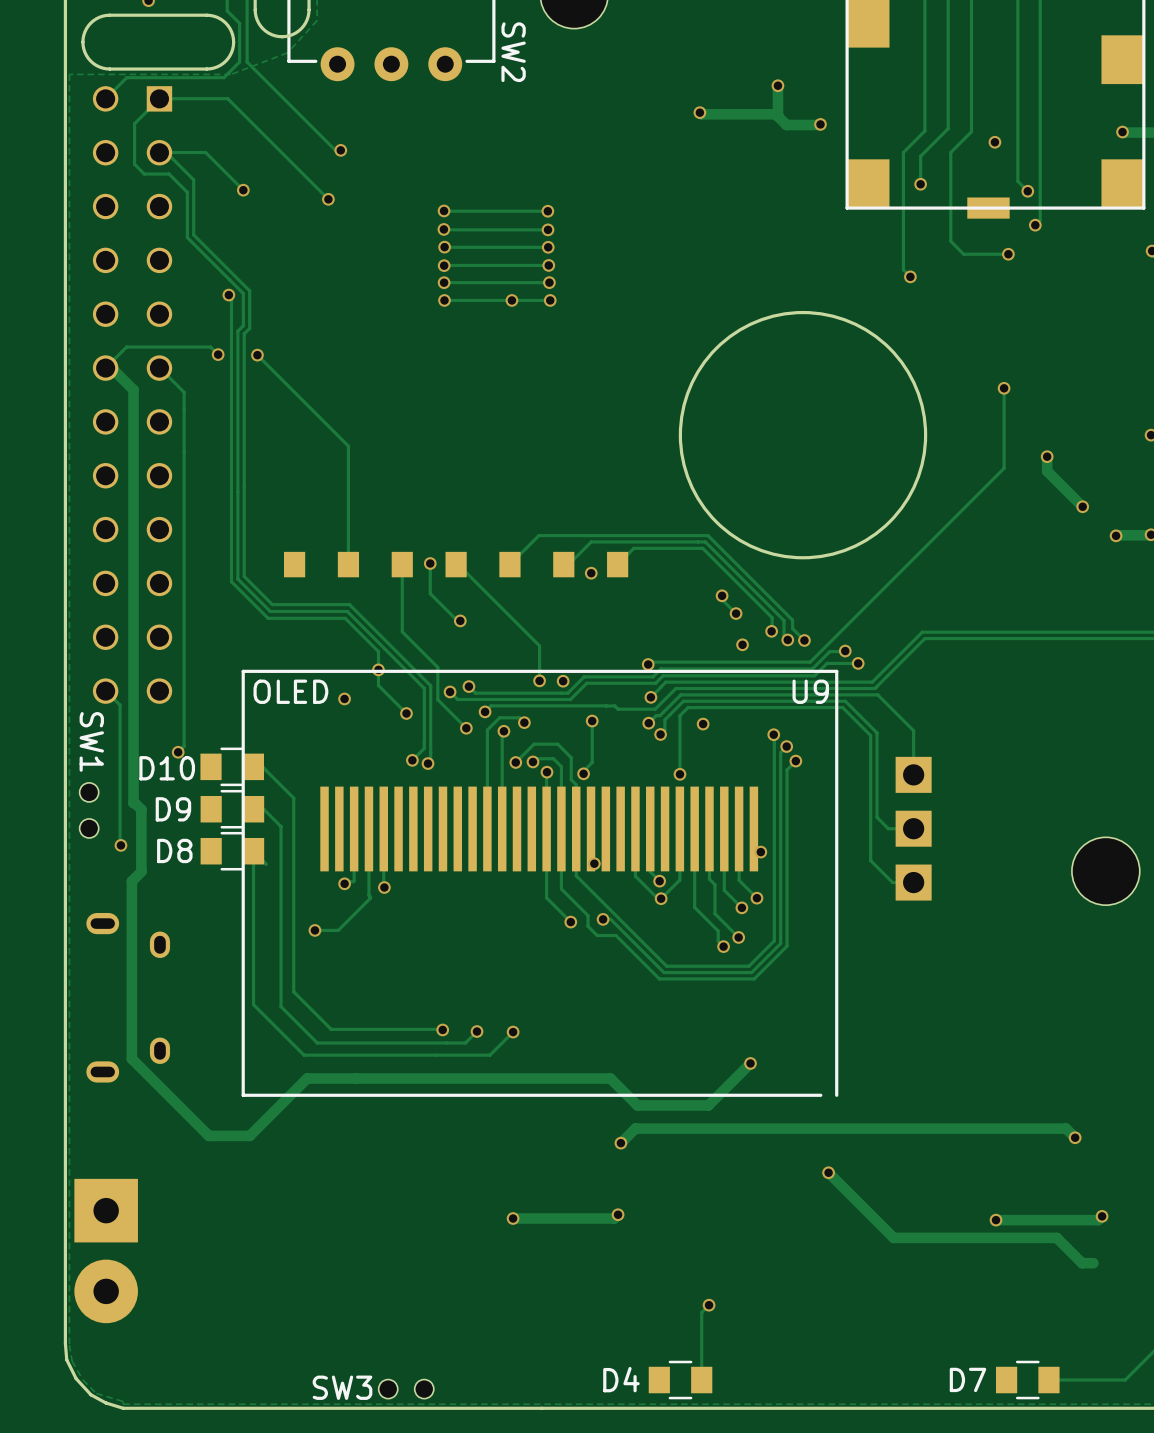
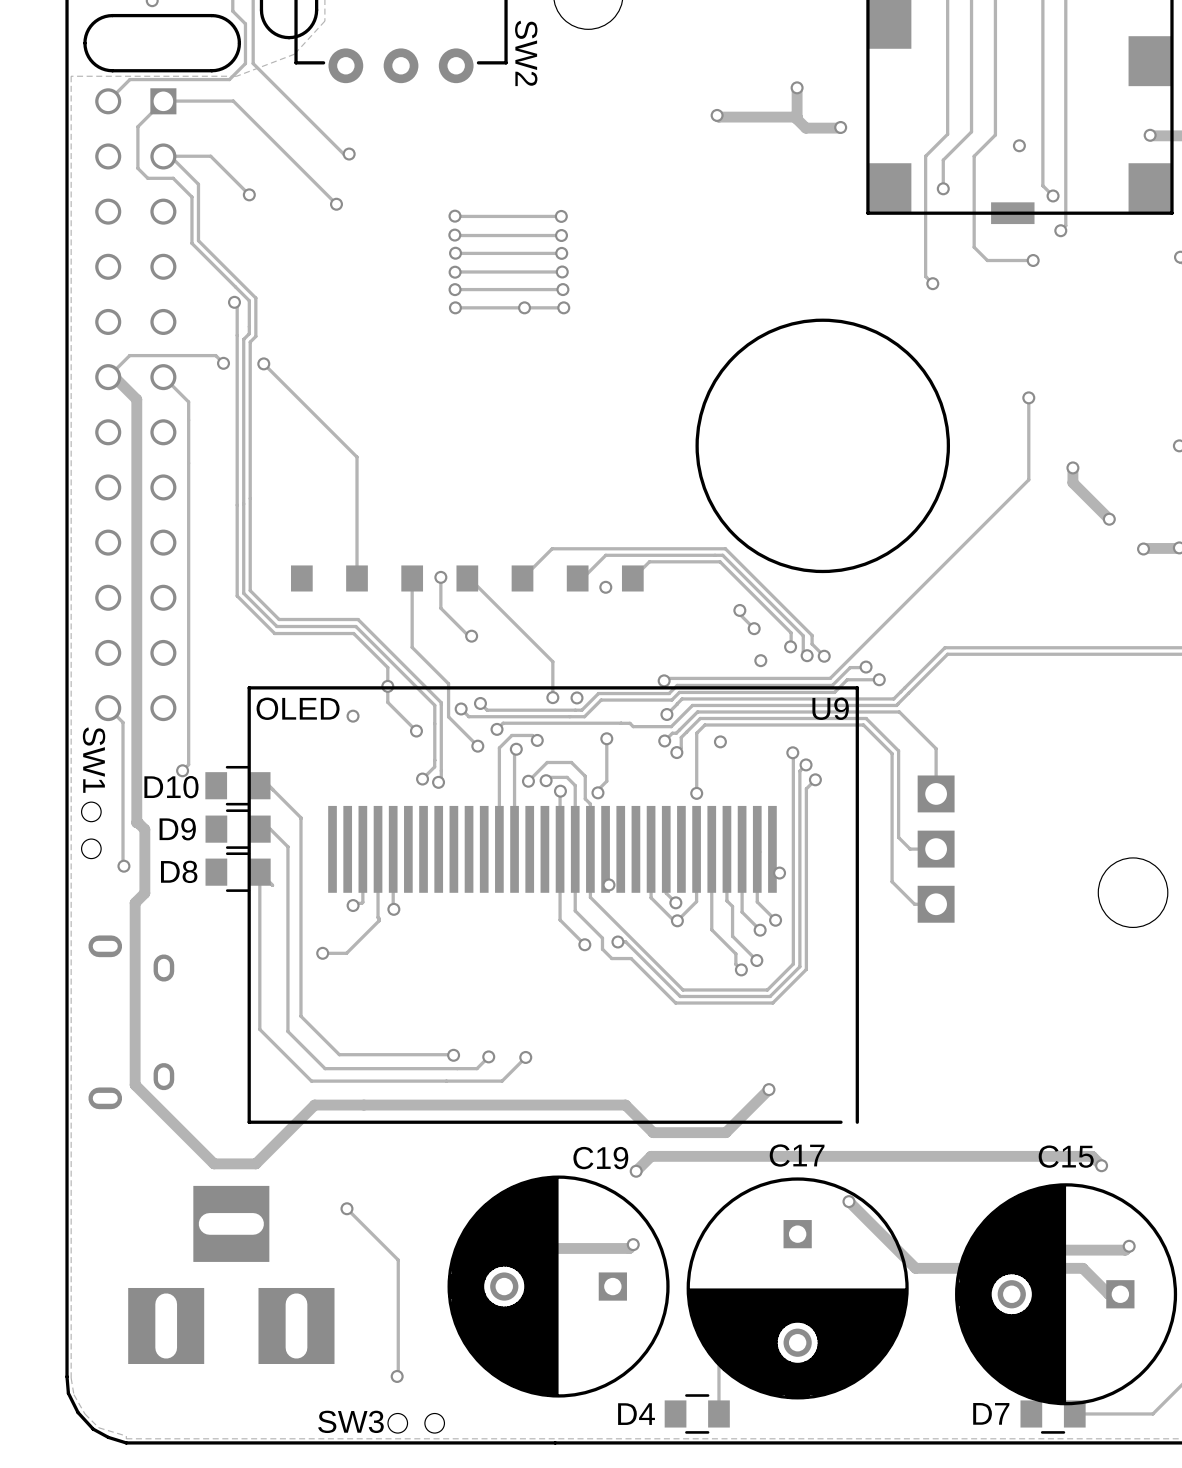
track: none -> (346, 1208) (398, 1260) (397, 1376)
via: none -> (346, 1208)
part: none -> (231, 1274)
part: (106, 1251) -> none
C19: none -> (558, 1286)
C17: none -> (797, 1288)
C15: none -> (1066, 1294)
via: none -> (397, 1376)

